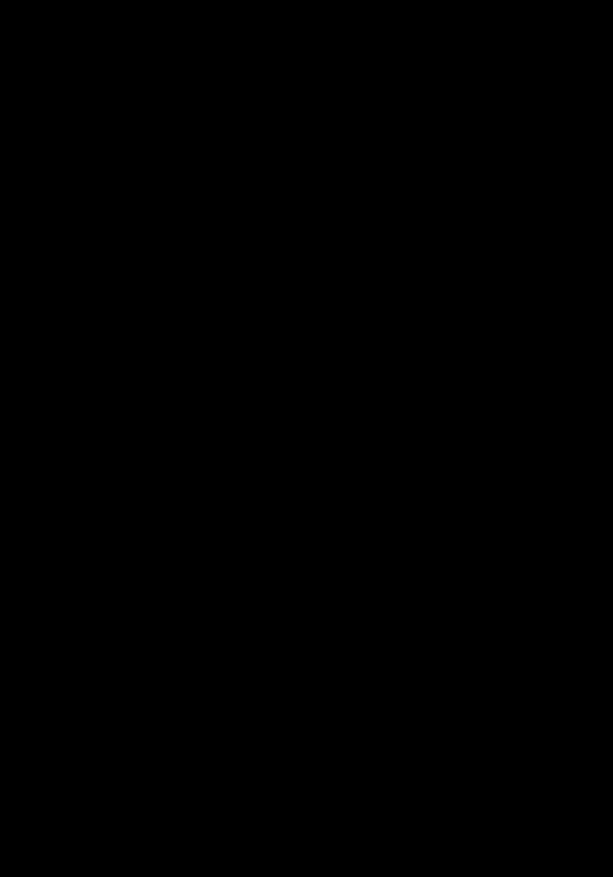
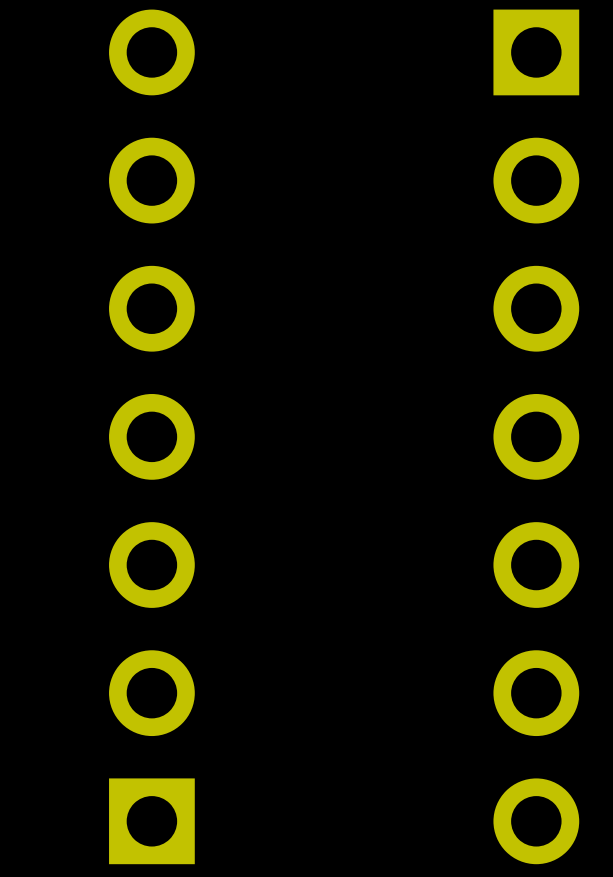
part: none -> (151, 436)
part: none -> (536, 436)

